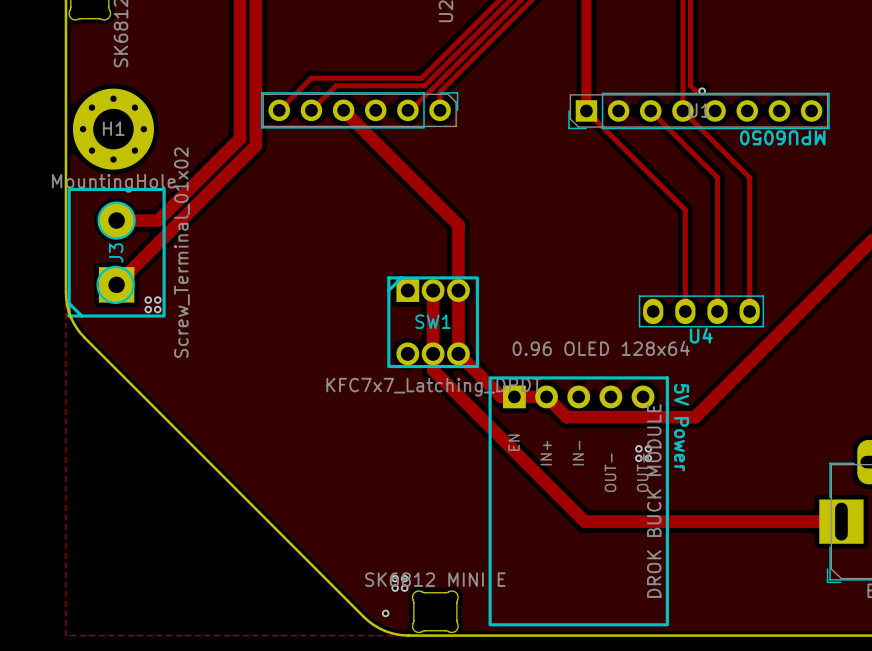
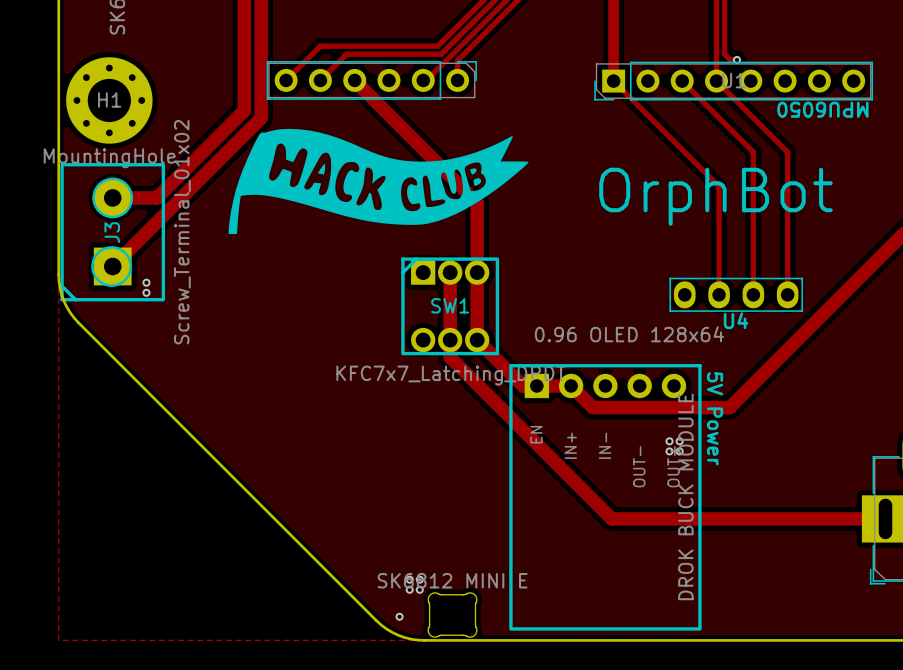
drawing: none -> [228, 128, 529, 235]
text: none -> OrphBot (715, 196)
via: (157, 300) -> none
via: (157, 309) -> none

